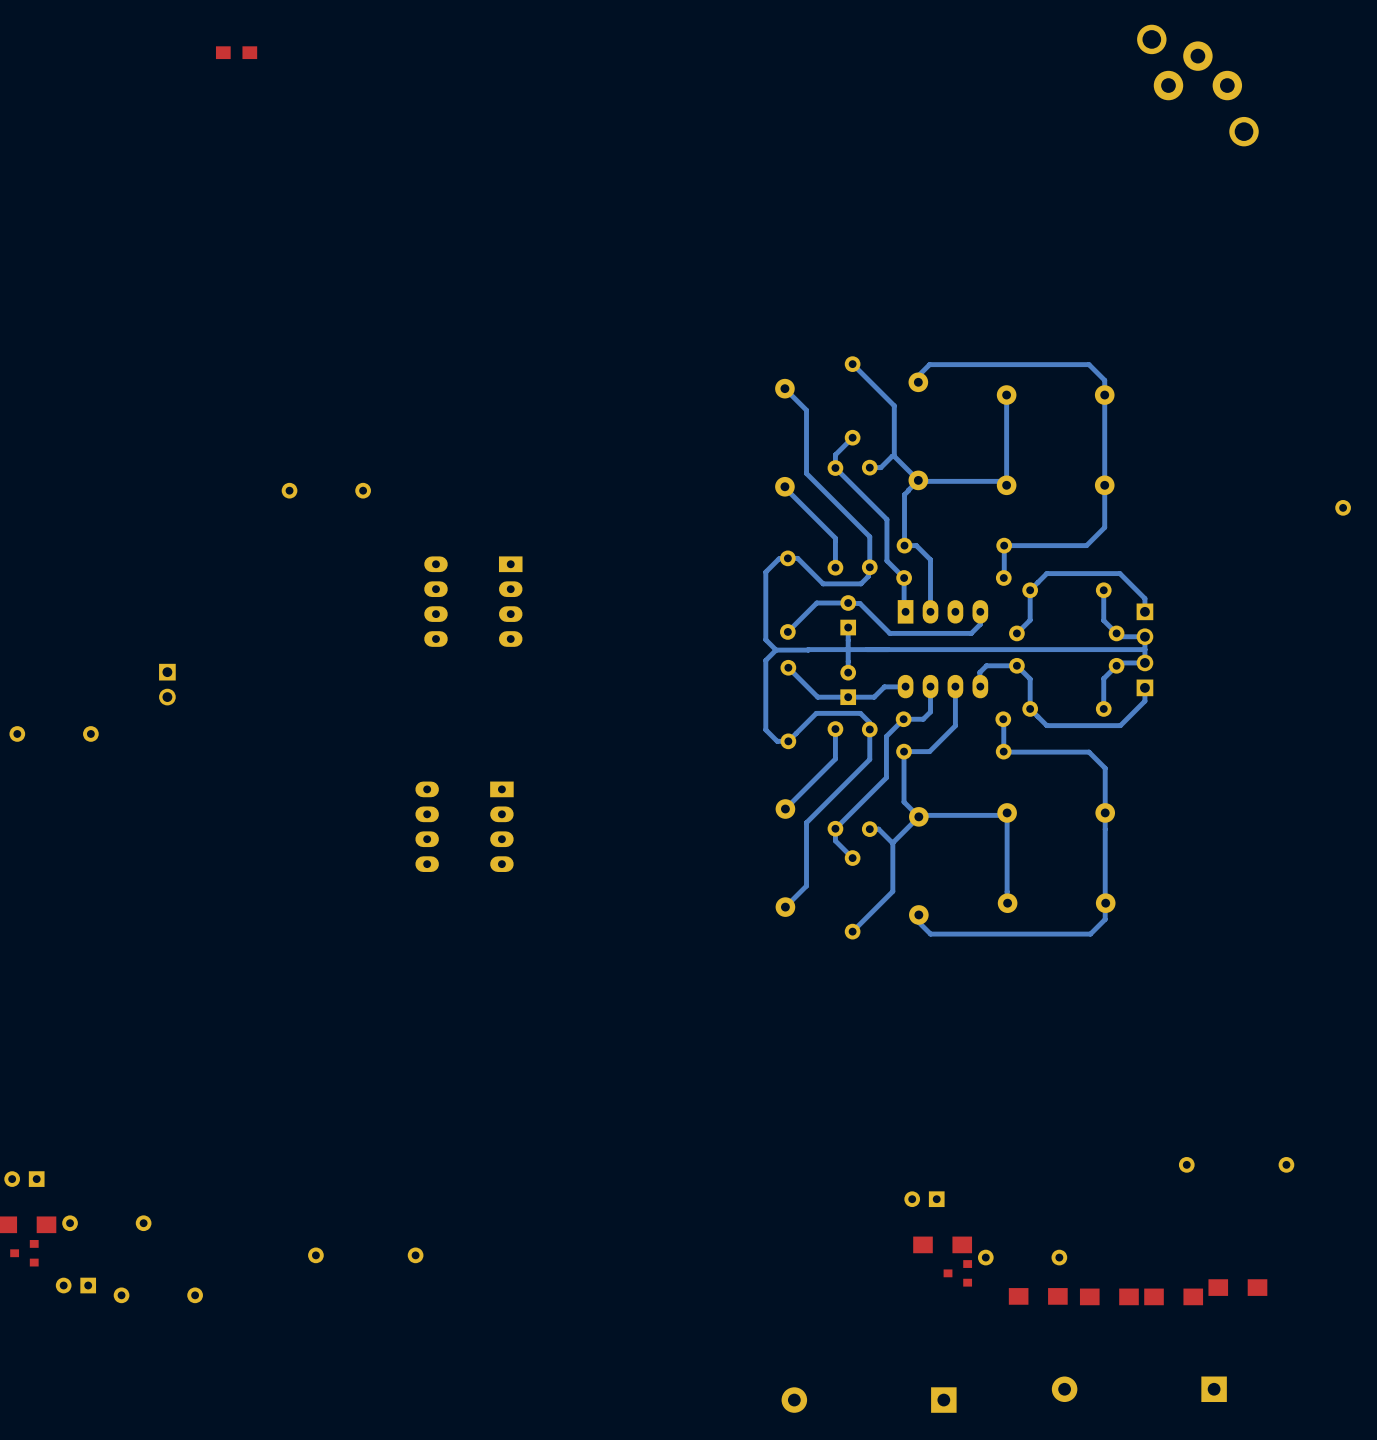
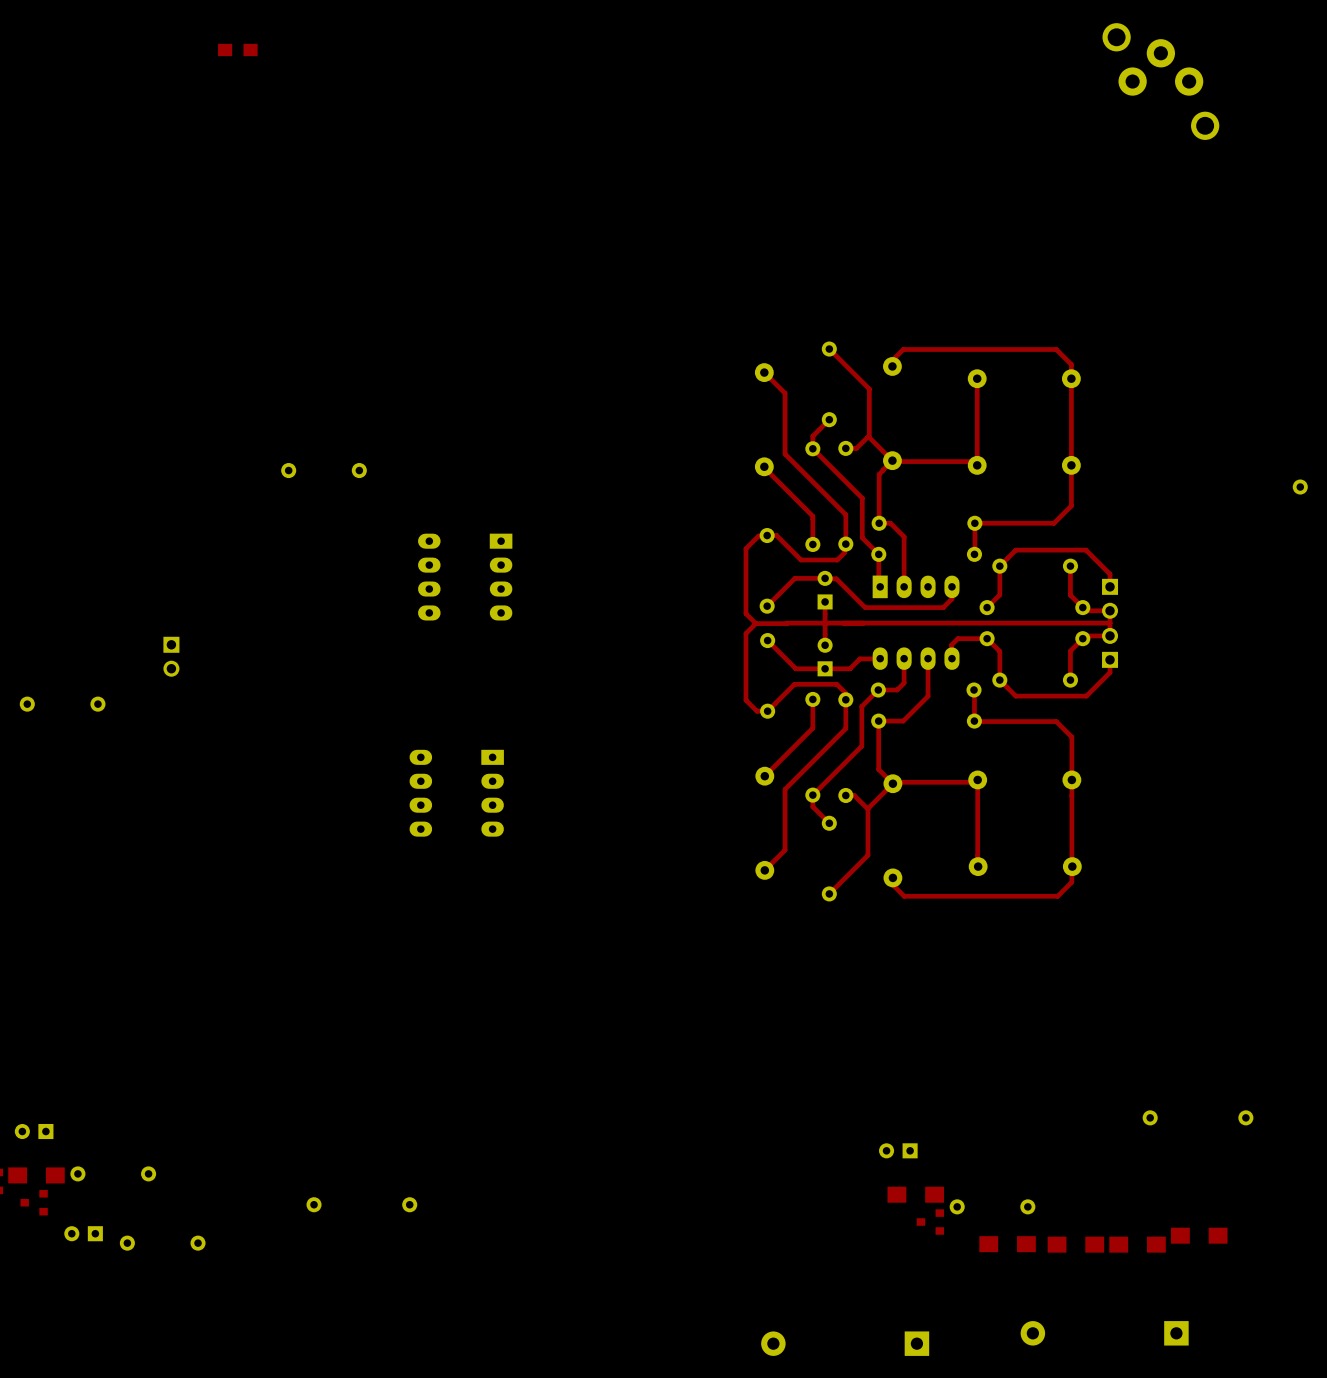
bottom track: (852, 364) (894, 405) (894, 456) -> none
top track: none -> (829, 349) (869, 389) (869, 437)
bottom track: (918, 375) (929, 364) (1089, 364) (1104, 380) (1104, 527) (1086, 545) (1004, 545) (1004, 578) -> none
top track: none -> (892, 359) (903, 349) (1056, 349) (1071, 364) (1071, 505) (1053, 523) (974, 523) (975, 554)
bottom track: (784, 388) (806, 410) (806, 473) (869, 536) (869, 567) (868, 576) (860, 583) (823, 583) (797, 558) (779, 558) (765, 572) (765, 639) (776, 650) -> none
top track: none -> (764, 372) (785, 393) (785, 454) (845, 514) (845, 544) (844, 552) (837, 560) (801, 560) (776, 535) (758, 536) (745, 548) (745, 613) (755, 623)
bottom track: (1006, 390) (1006, 481) (926, 481) (918, 473) -> none
top track: none -> (977, 374) (977, 461) (900, 461) (892, 454)
bottom track: (852, 437) (835, 454) (835, 467) -> none
top track: none -> (829, 419) (812, 436) (812, 448)
bottom track: (894, 456) (918, 480) (904, 494) (904, 545) (916, 545) (930, 559) (930, 611) -> none
bottom track: (894, 456) (880, 467) (869, 467) -> none
top track: none -> (869, 437) (892, 460) (879, 474) (879, 523) (890, 523) (904, 536) (904, 586)
top track: none -> (869, 437) (856, 448) (845, 448)
bottom track: (835, 468) (886, 519) (886, 560) (904, 577) (905, 611) -> none
top track: none -> (812, 448) (862, 498) (862, 537) (878, 554) (880, 586)
bottom track: (784, 486) (835, 538) (835, 567) -> none
top track: none -> (764, 466) (812, 516) (812, 544)
bottom track: (1103, 590) (1103, 620) (1119, 636) (1144, 636) (1144, 662) (1119, 662) (1103, 678) (1103, 708) -> none
top track: none -> (1070, 566) (1070, 595) (1086, 610) (1110, 610) (1110, 635) (1085, 635) (1070, 651) (1070, 680)
bottom track: (980, 611) (980, 624) (971, 633) (889, 633) (859, 603) (816, 603) (787, 631) -> none
top track: none -> (951, 586) (951, 598) (943, 607) (865, 607) (836, 578) (794, 578) (767, 606)
bottom track: (1144, 611) (1144, 598) (1119, 573) (1046, 573) (1030, 590) (1030, 620) (1016, 633) -> none
top track: none -> (1110, 586) (1110, 574) (1086, 550) (1015, 550) (999, 566) (999, 594) (987, 607)
bottom track: (848, 627) (848, 672) -> none
top track: none -> (825, 601) (825, 645)
bottom track: (1144, 649) (776, 650) -> none
top track: none -> (1110, 623) (755, 623)
bottom track: (776, 650) (765, 660) (765, 729) (777, 741) (788, 741) (816, 713) (860, 713) (869, 722) (869, 759) (806, 822) (806, 886) (785, 907) -> none
top track: none -> (755, 623) (745, 633) (745, 700) (756, 711) (767, 711) (794, 684) (836, 684) (845, 693) (845, 728) (785, 789) (785, 850) (764, 870)
bottom track: (788, 667) (817, 697) (874, 697) (884, 686) (905, 686) -> none
top track: none -> (767, 640) (795, 668) (850, 668) (859, 658) (880, 658)
bottom track: (979, 685) (979, 672) (986, 665) (1016, 665) (1030, 679) (1030, 708) (1046, 725) (1120, 725) (1144, 701) (1144, 687) -> none
top track: none -> (951, 657) (951, 645) (957, 638) (987, 638) (999, 651) (999, 680) (1015, 696) (1086, 696) (1110, 672) (1110, 659)
bottom track: (930, 686) (930, 711) (923, 719) (903, 719) (886, 736) (886, 777) (835, 828) (835, 840) (852, 858) -> none
top track: none -> (904, 658) (904, 683) (897, 690) (878, 690) (861, 706) (861, 746) (812, 795) (812, 806) (829, 823)
bottom track: (955, 686) (955, 725) (929, 751) (904, 751) (904, 802) (918, 816) (918, 822) -> none
top track: none -> (928, 658) (928, 696) (903, 721) (878, 721) (878, 769) (892, 783) (892, 789)
bottom track: (1004, 719) (1003, 752) (1089, 752) (1105, 768) (1105, 919) (1090, 934) (930, 934) (918, 922) (918, 914) -> none
top track: none -> (974, 690) (974, 721) (1056, 721) (1071, 737) (1071, 882) (1057, 896) (904, 896) (892, 884) (892, 877)
bottom track: (835, 729) (835, 758) (785, 809) -> none
top track: none -> (812, 699) (812, 728) (764, 776)
bottom track: (869, 829) (878, 829) (892, 842) -> none
top track: none -> (845, 795) (854, 795) (867, 808)
bottom track: (892, 842) (920, 815) (1007, 815) (1007, 905) -> none
bottom track: (892, 842) (892, 891) (852, 931) -> none
top track: none -> (867, 808) (894, 782) (977, 782) (977, 868)
top track: none -> (867, 808) (867, 855) (829, 893)

